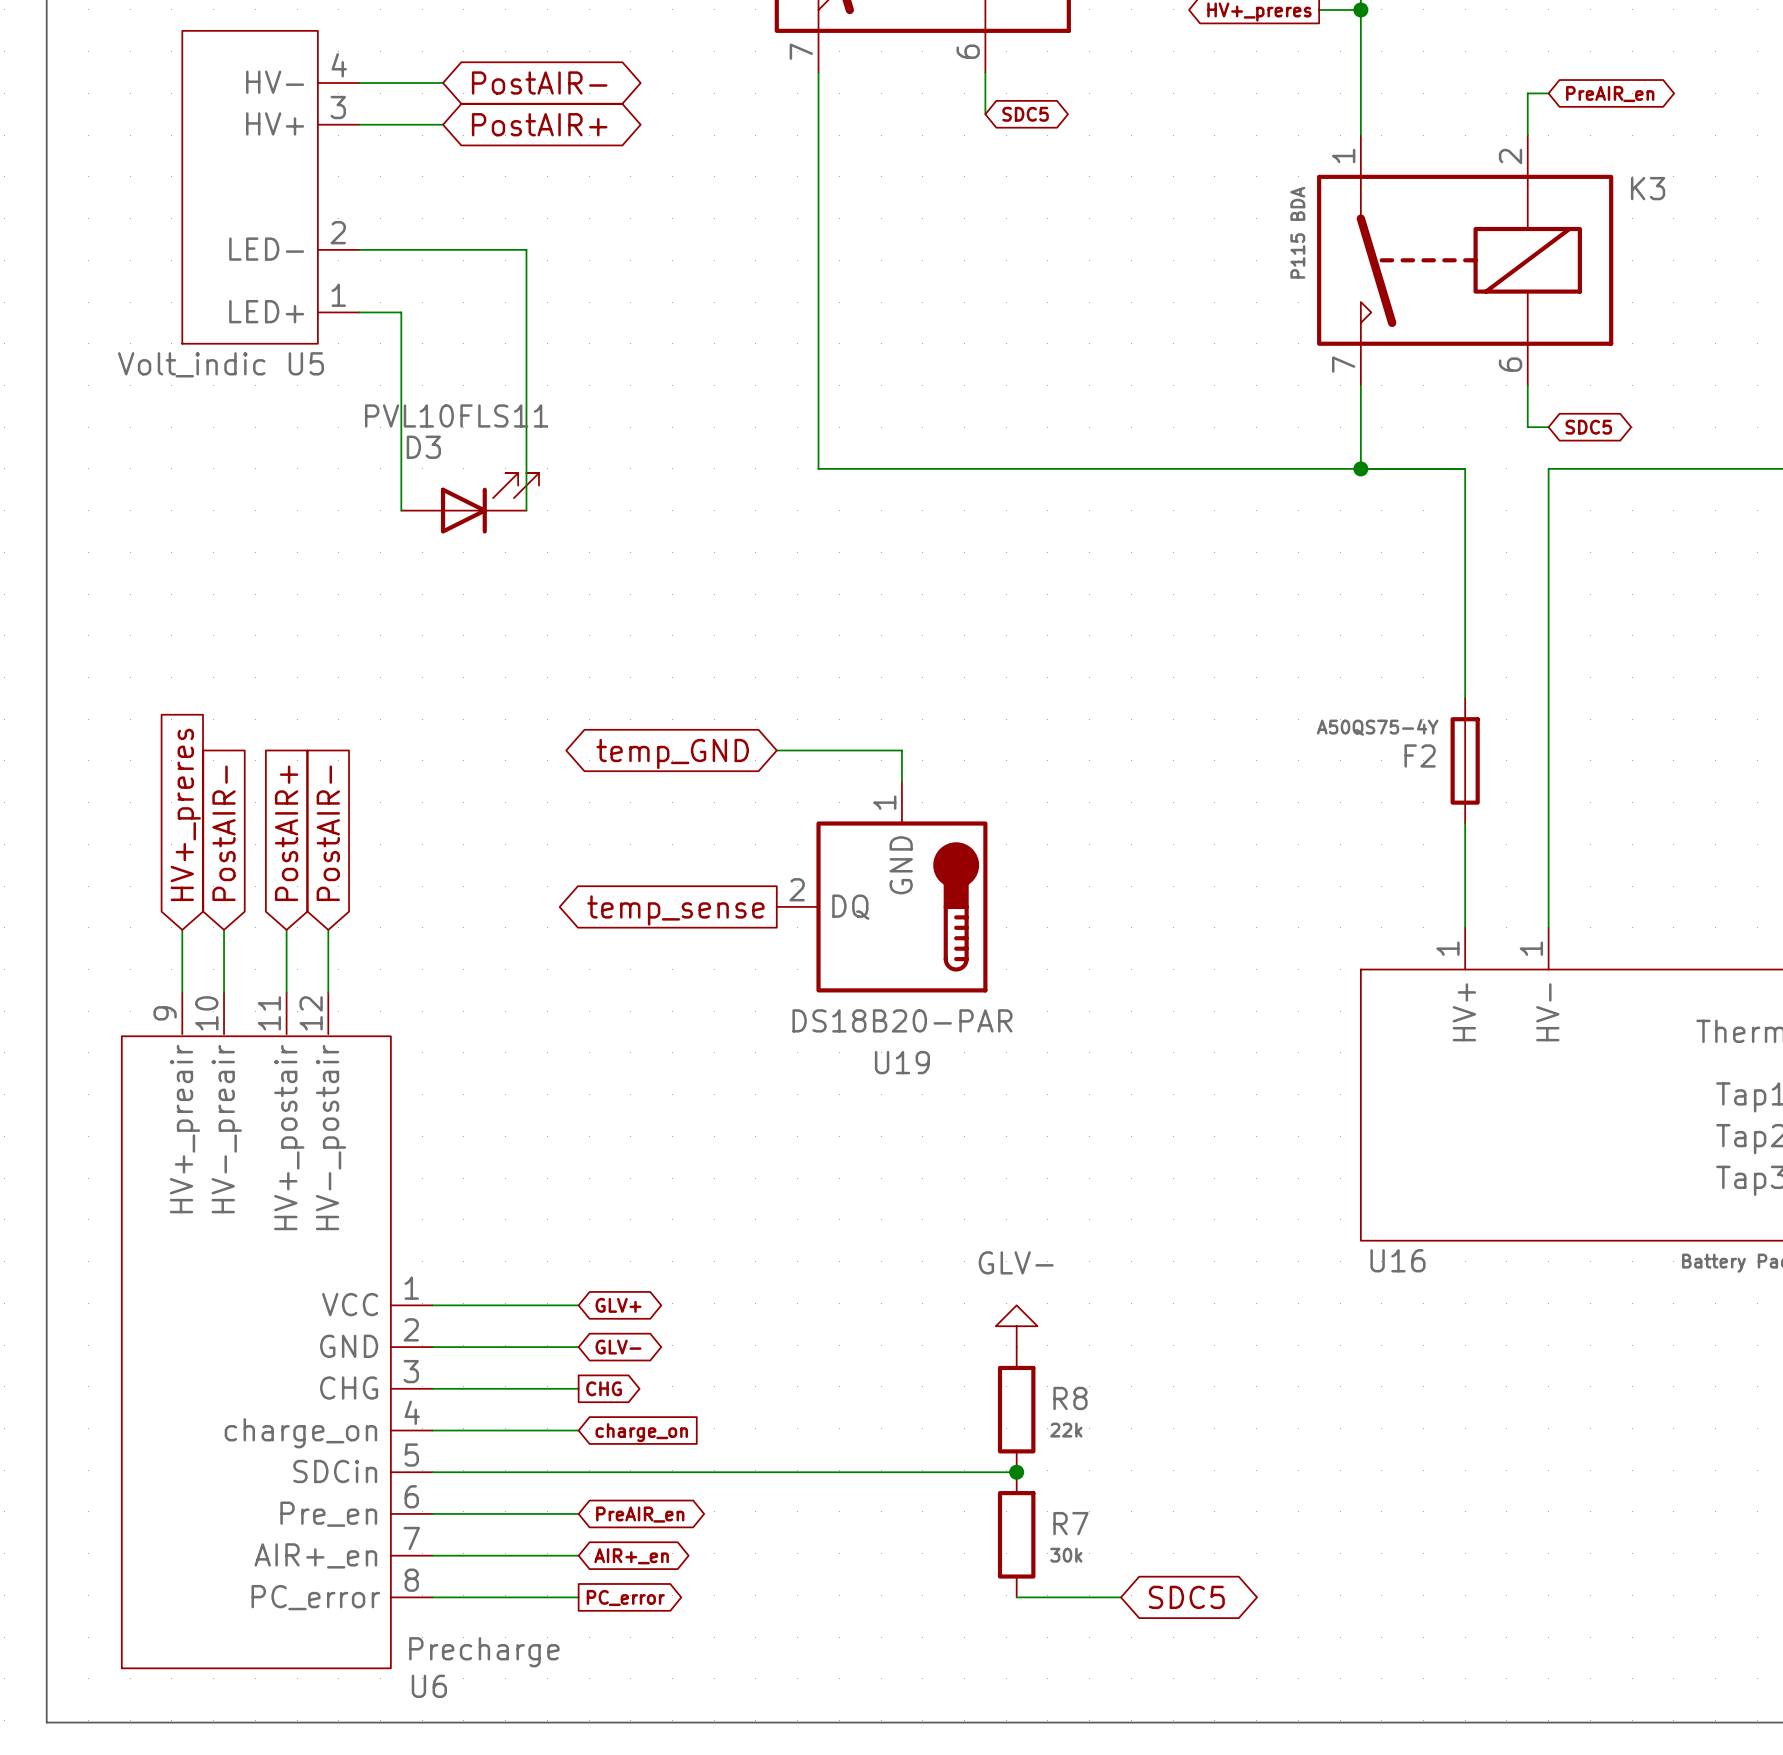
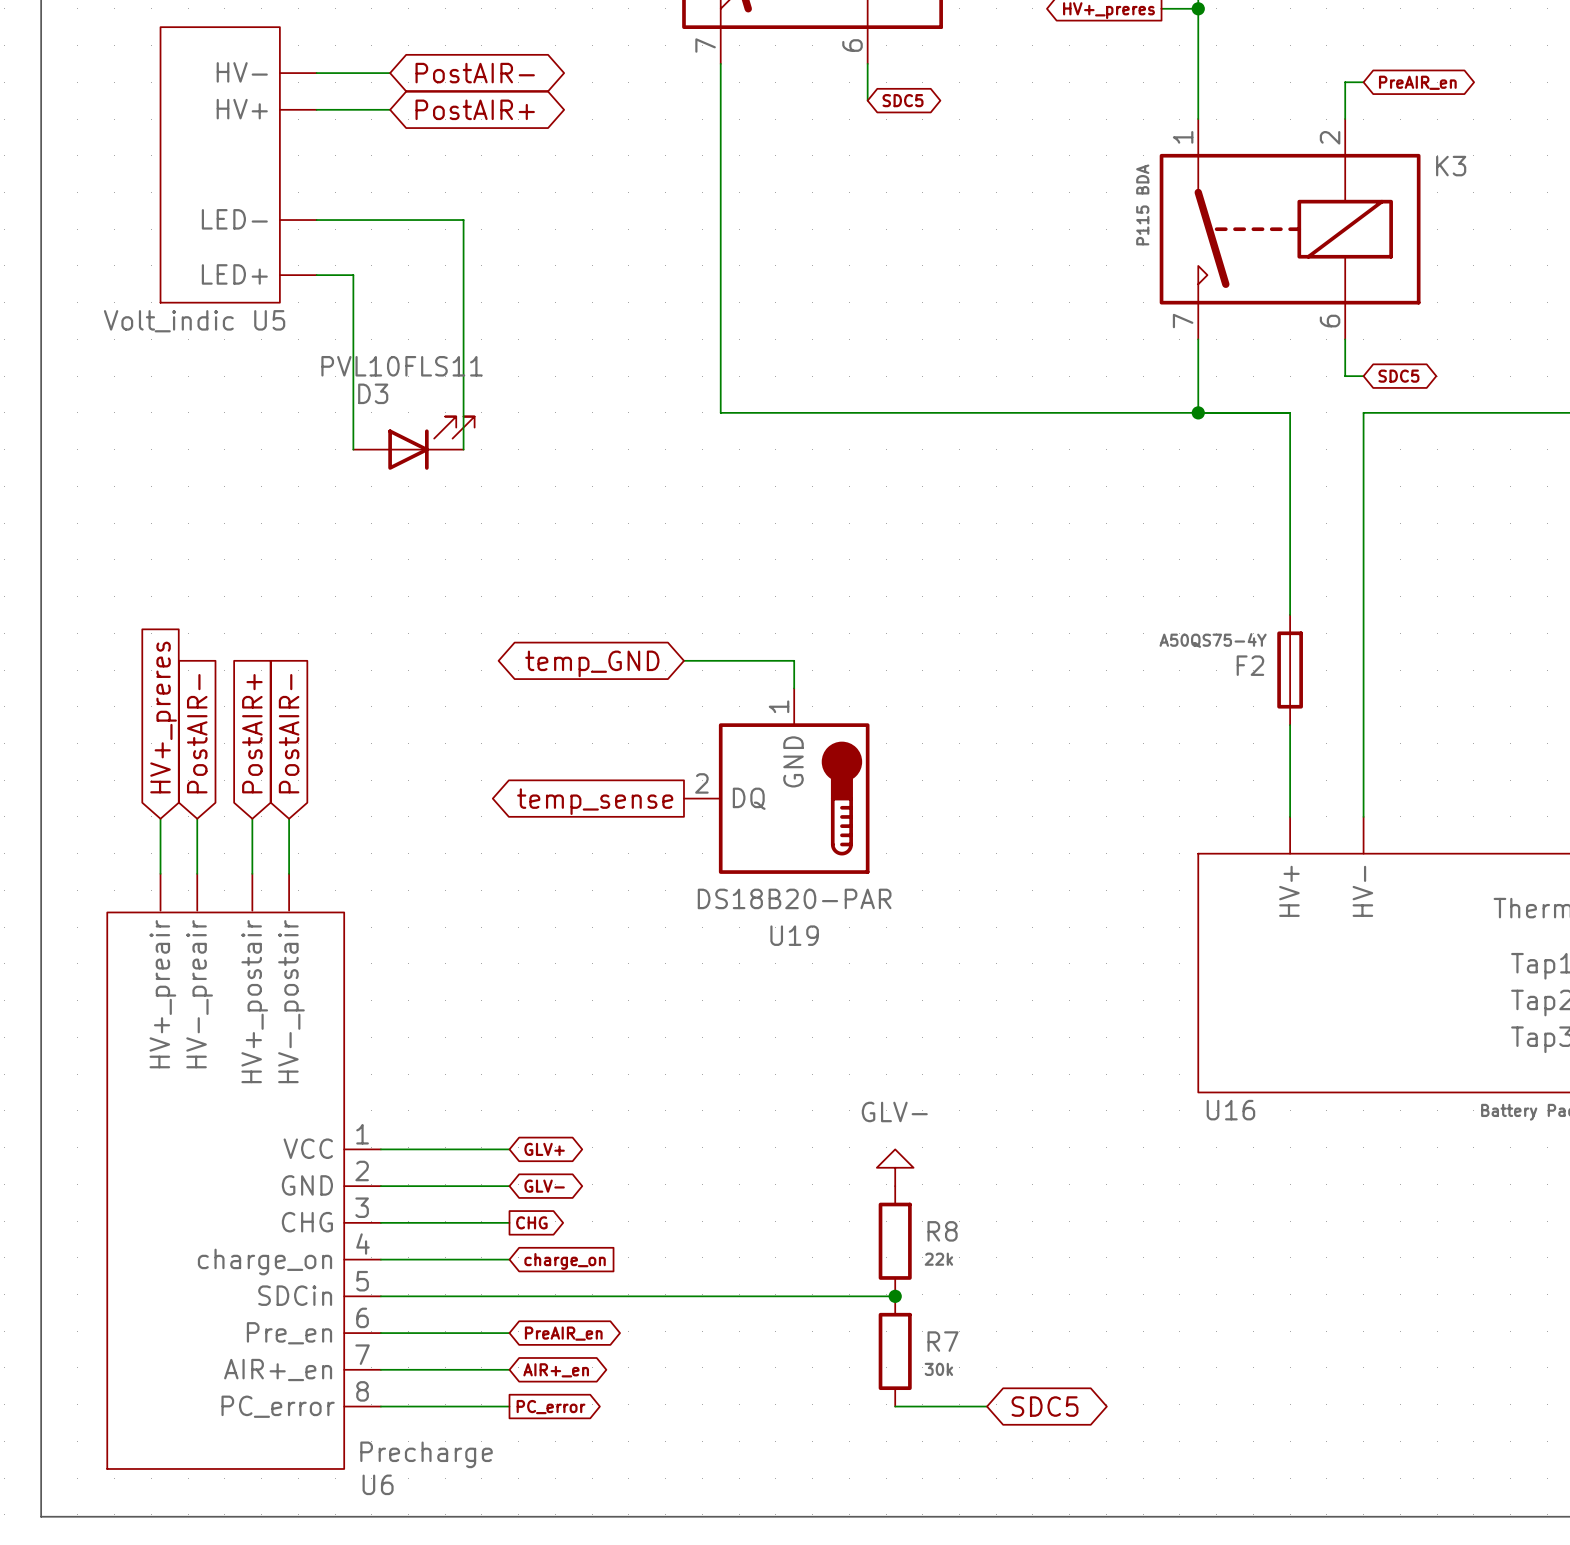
U5 pin number: 4 (339, 65) -> none
U5 pin number: 3 (338, 107) -> none
U5 pin number: 2 (338, 232) -> none
U5 pin number: 1 (338, 295) -> none
U16 pin number: 1 (1447, 948) -> none
U16 pin number: 1 (1531, 948) -> none
U6 pin number: 9 (165, 1013) -> none
U6 pin number: 10 (206, 1013) -> none
U6 pin number: 11 (269, 1013) -> none
U6 pin number: 12 (311, 1013) -> none

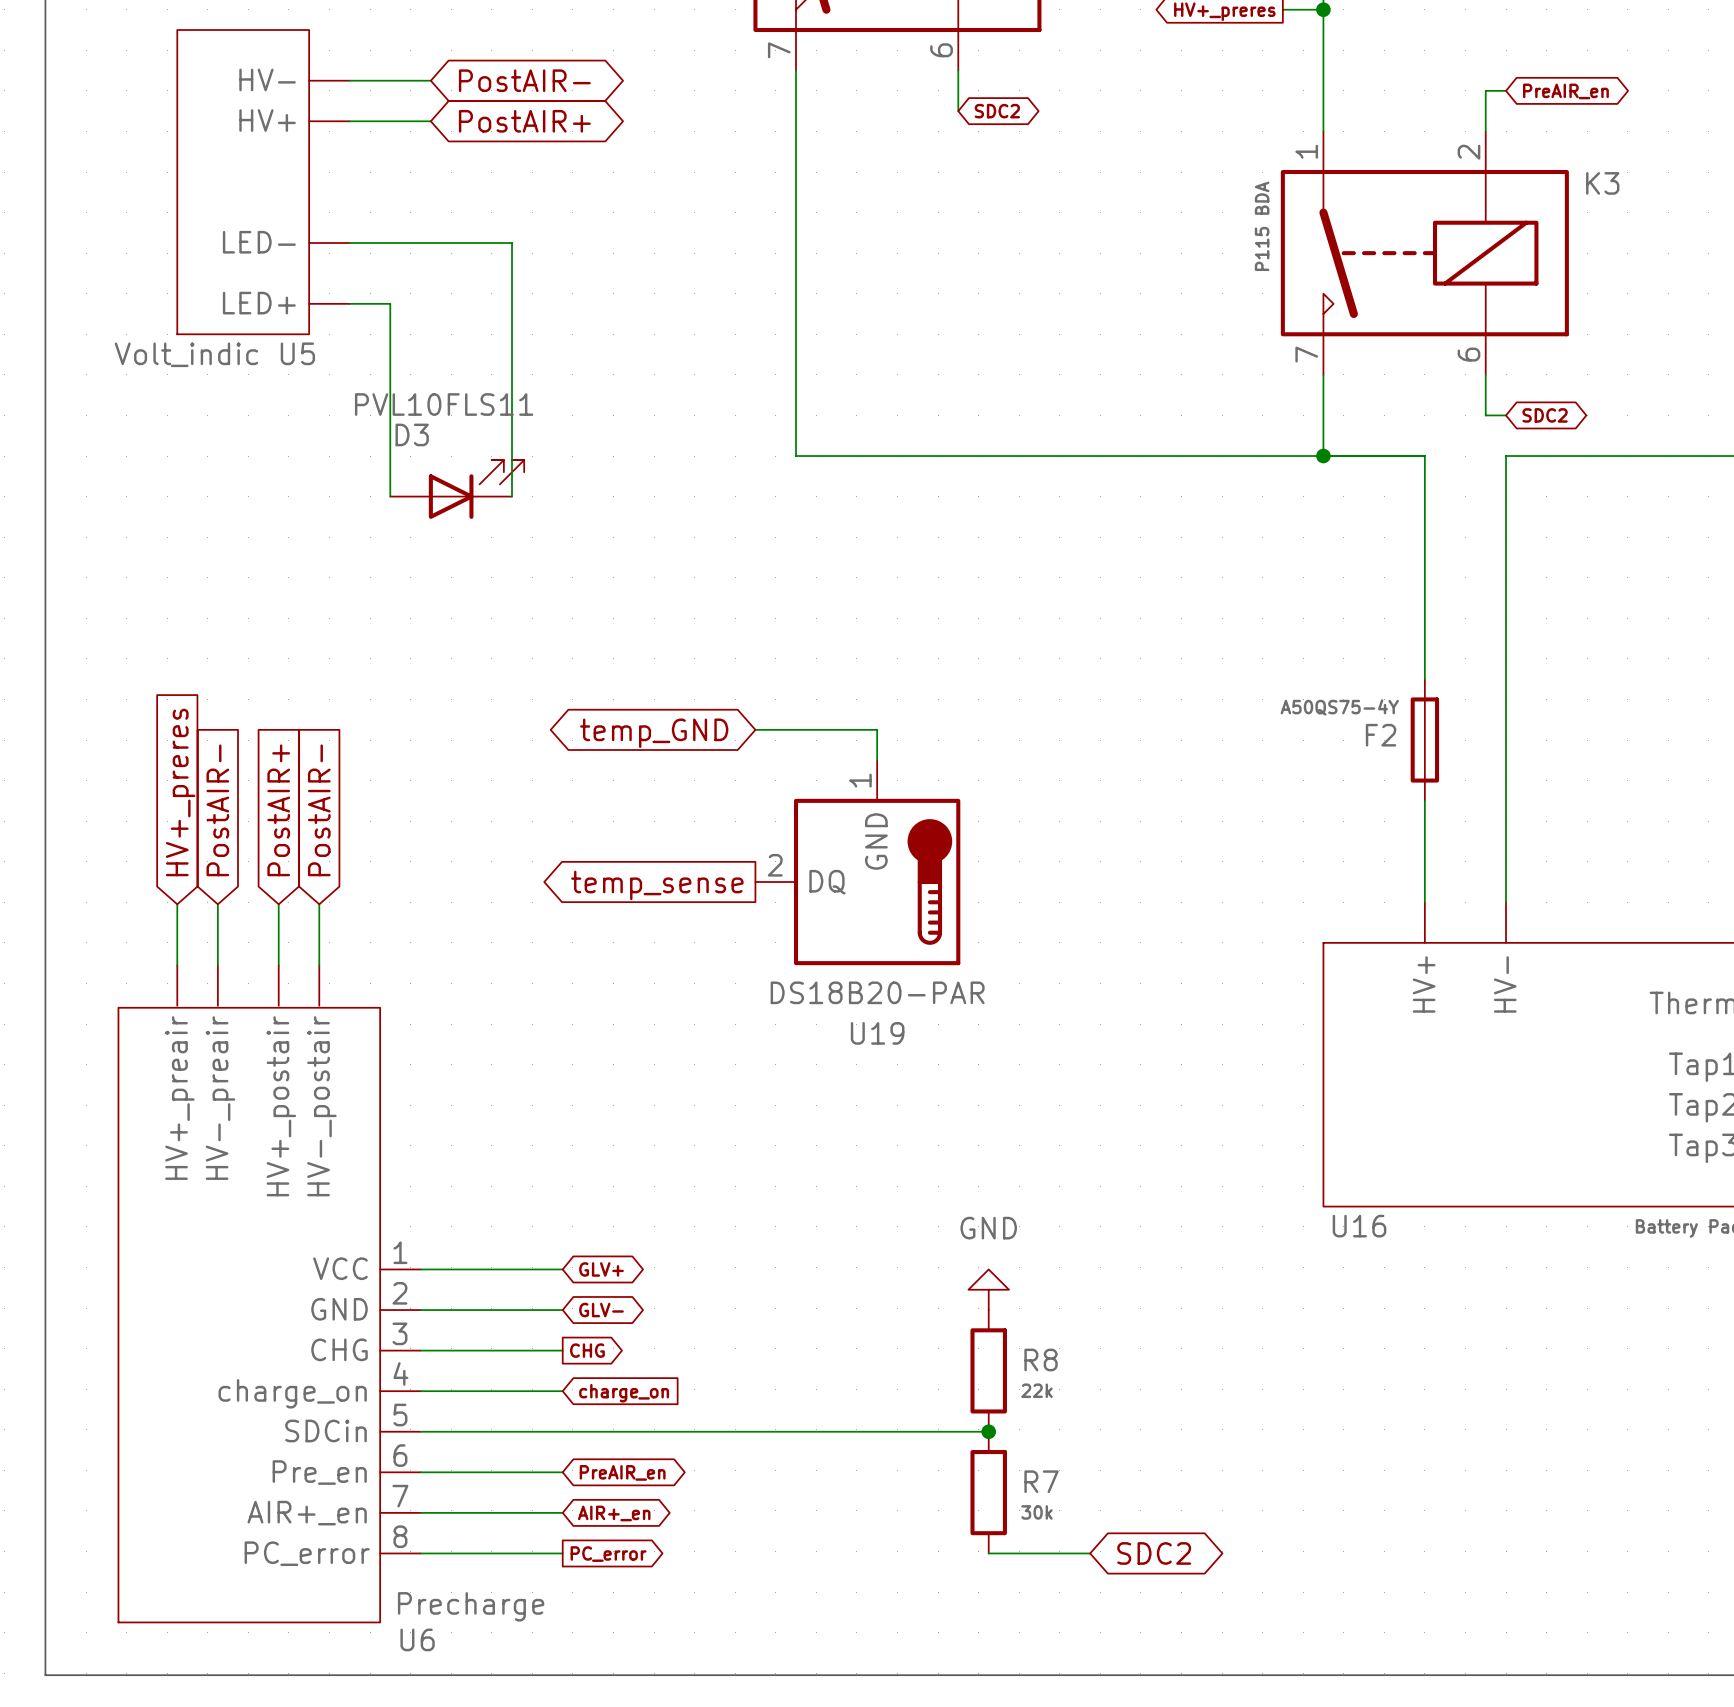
global label: SDC5 (903, 100) -> SDC2 (997, 111)
global label: SDC5 (1398, 376) -> SDC2 (1545, 415)
power symbol: GLV- (895, 1167) -> GND (988, 1289)
global label: SDC5 (1045, 1406) -> SDC2 (1154, 1553)

